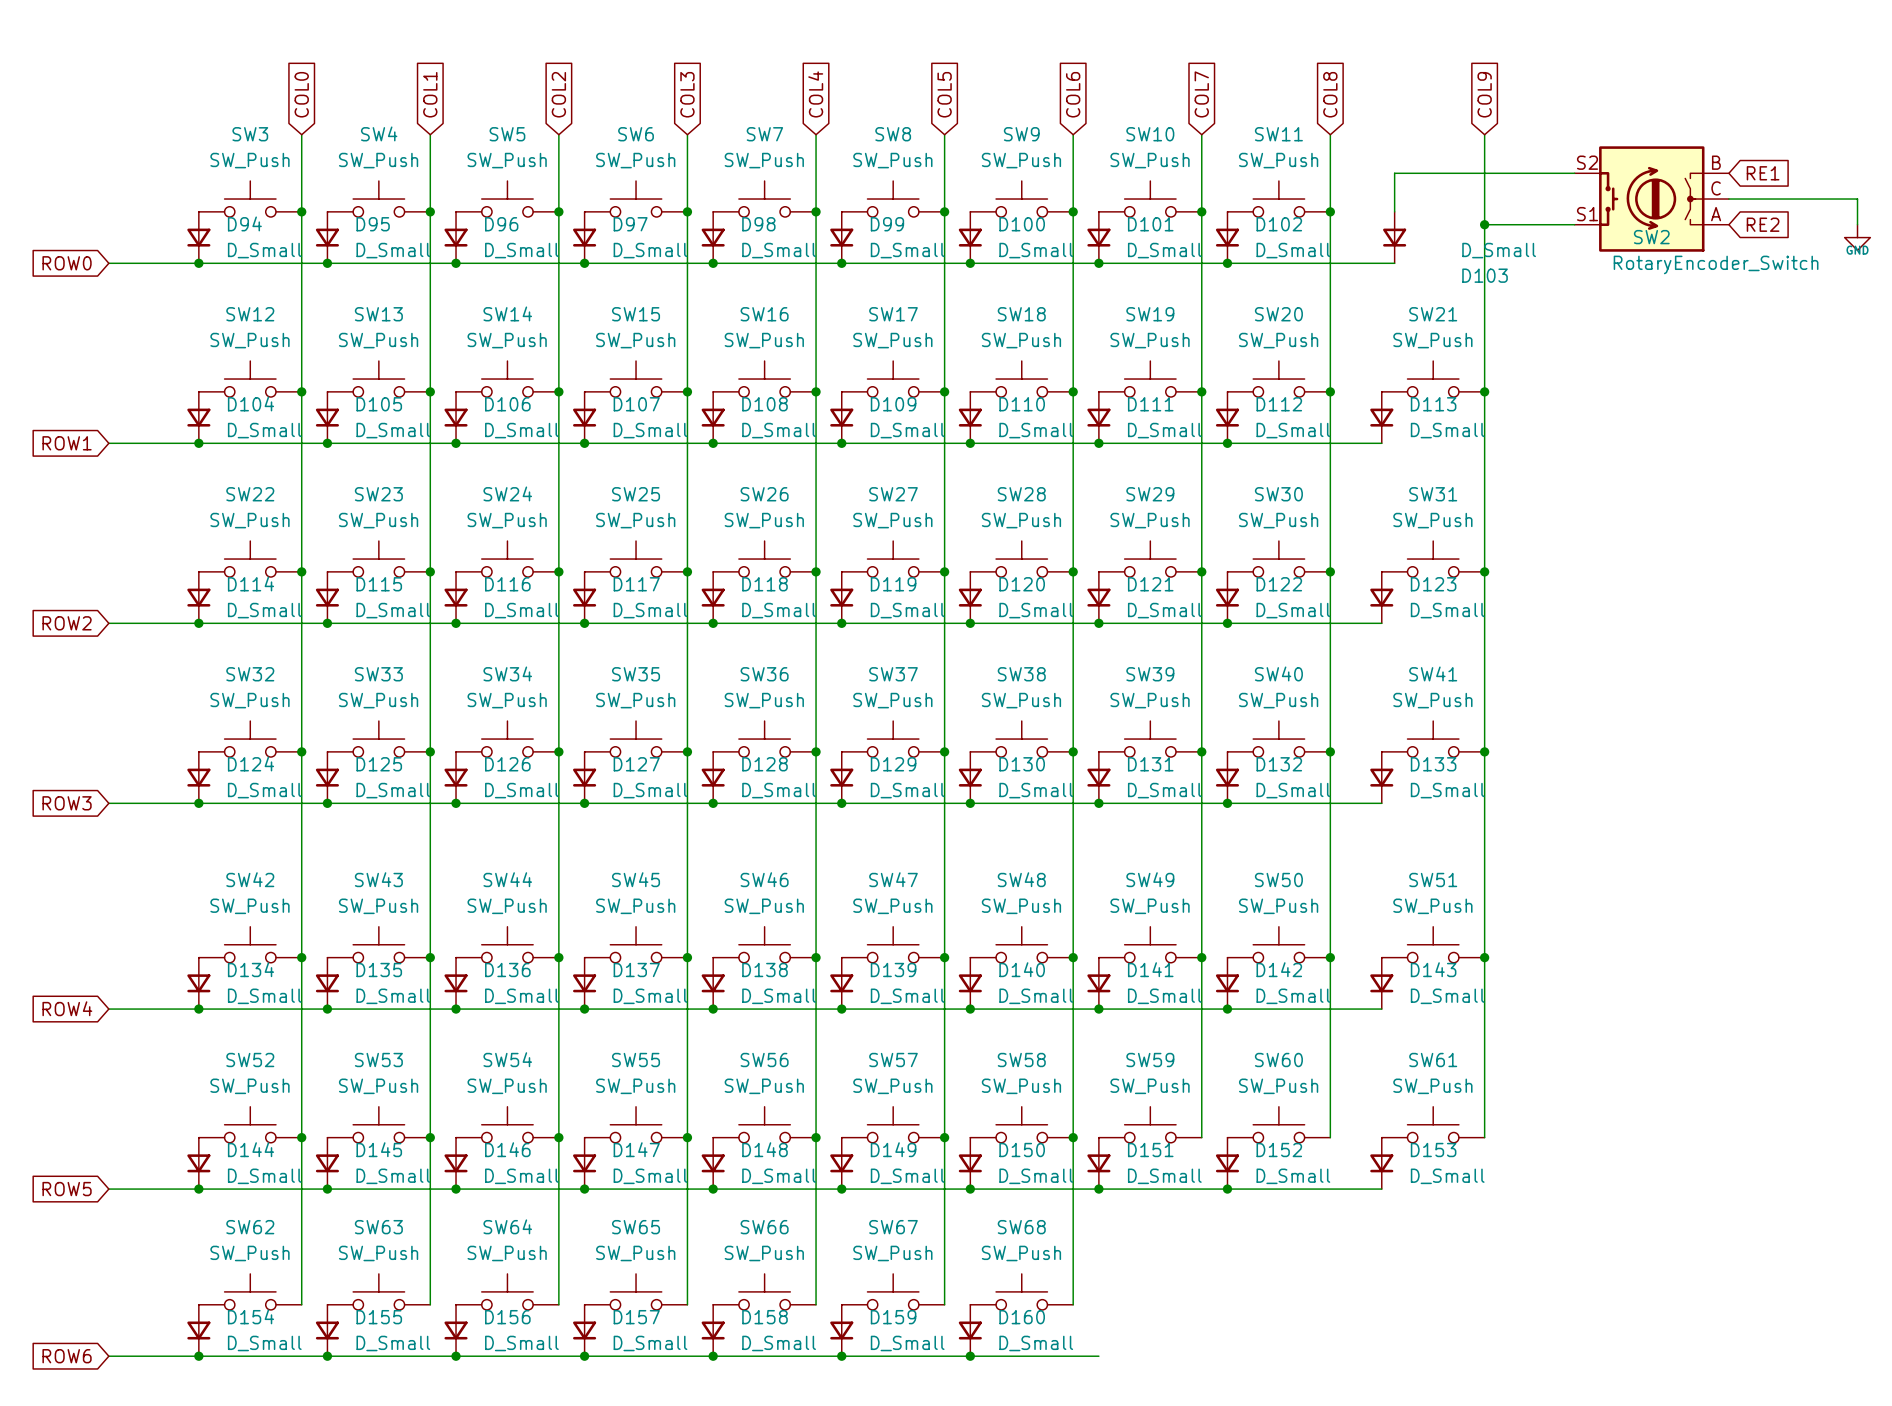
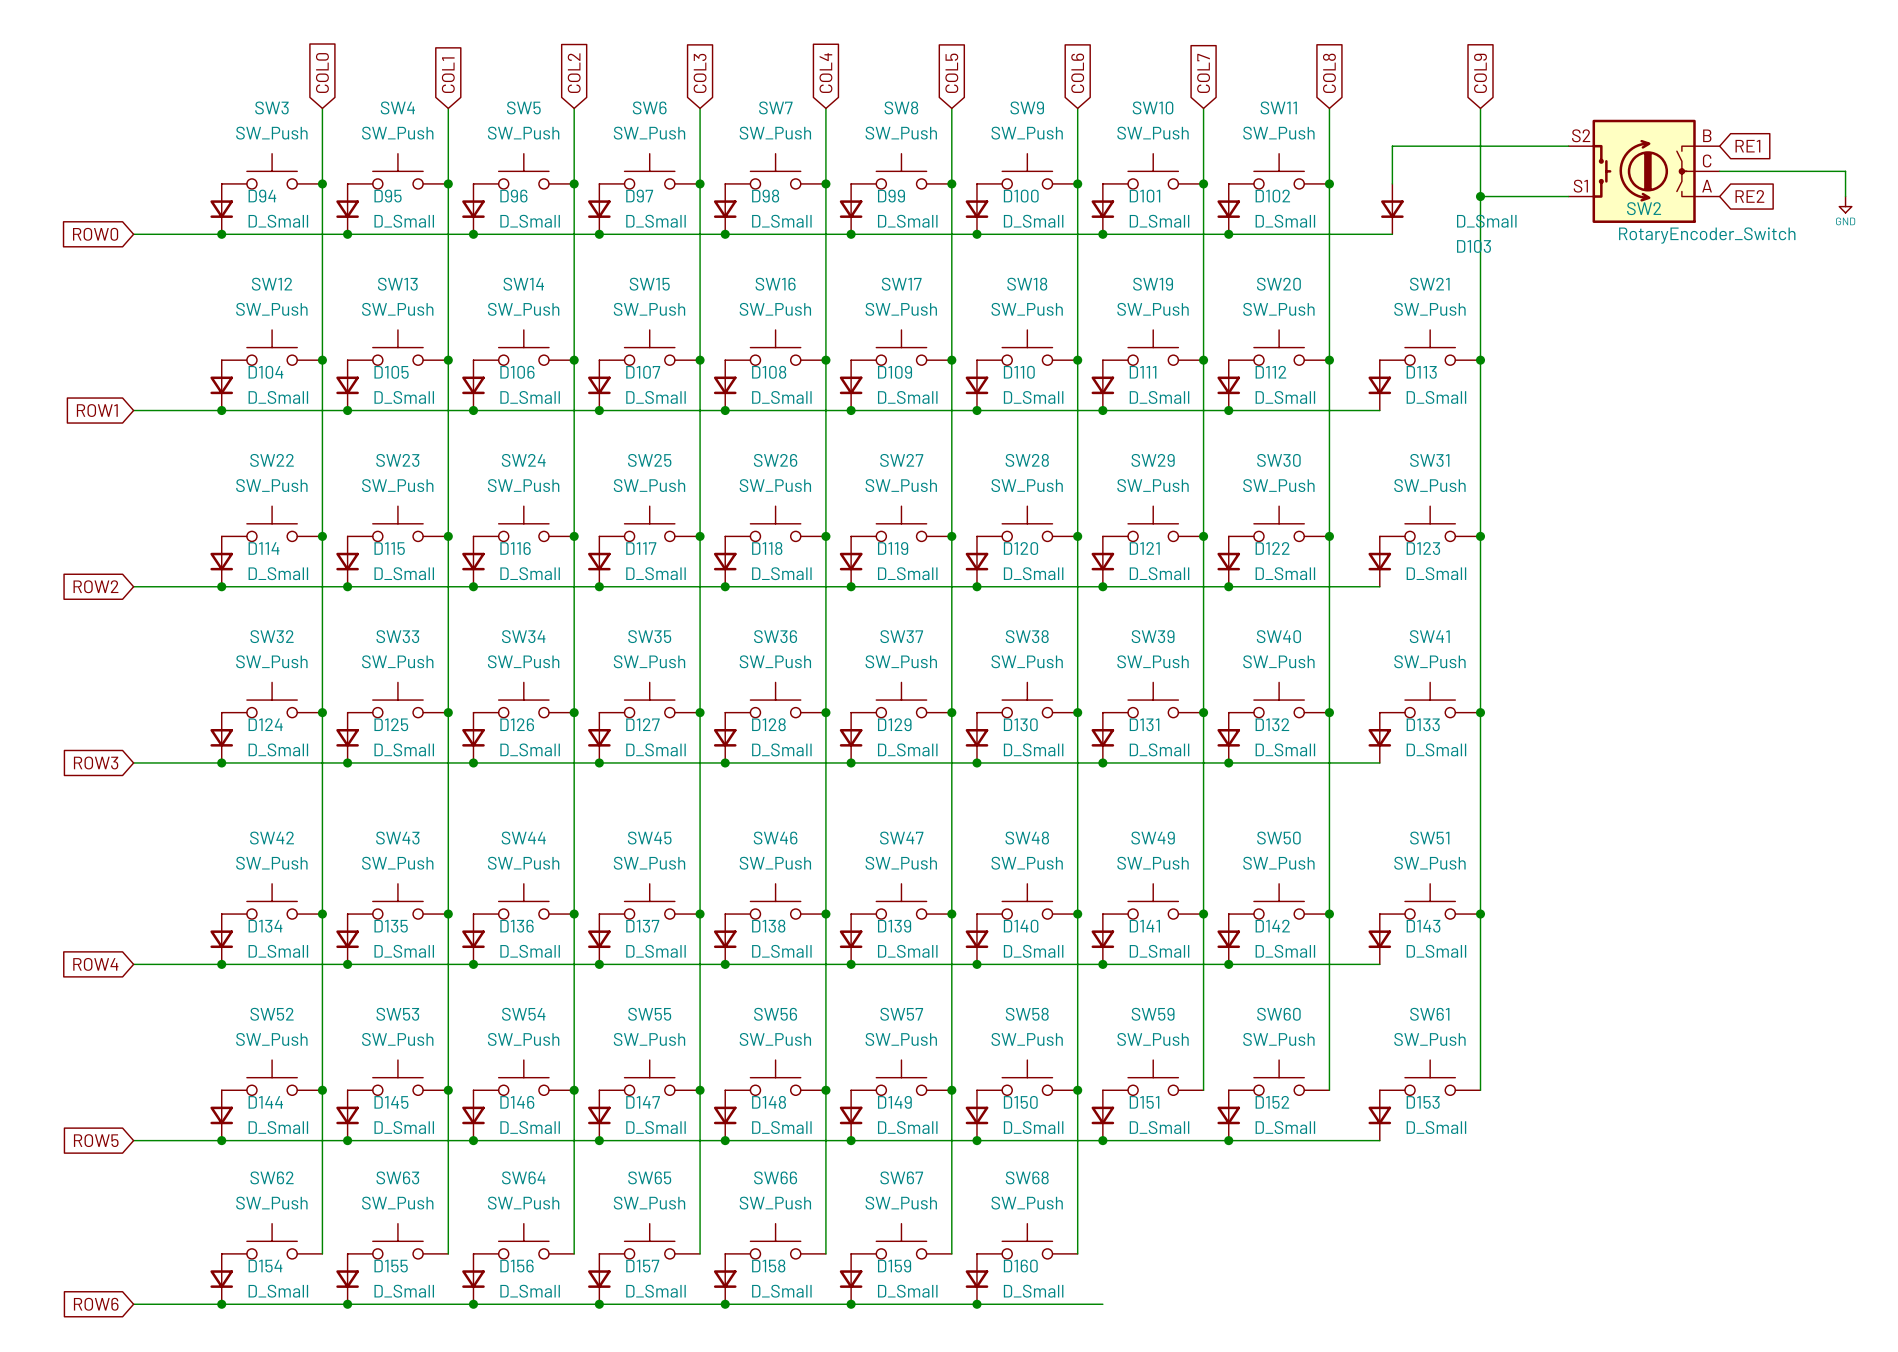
power symbol shape: [1844, 224, 1871, 251] -> [1839, 196, 1852, 213]

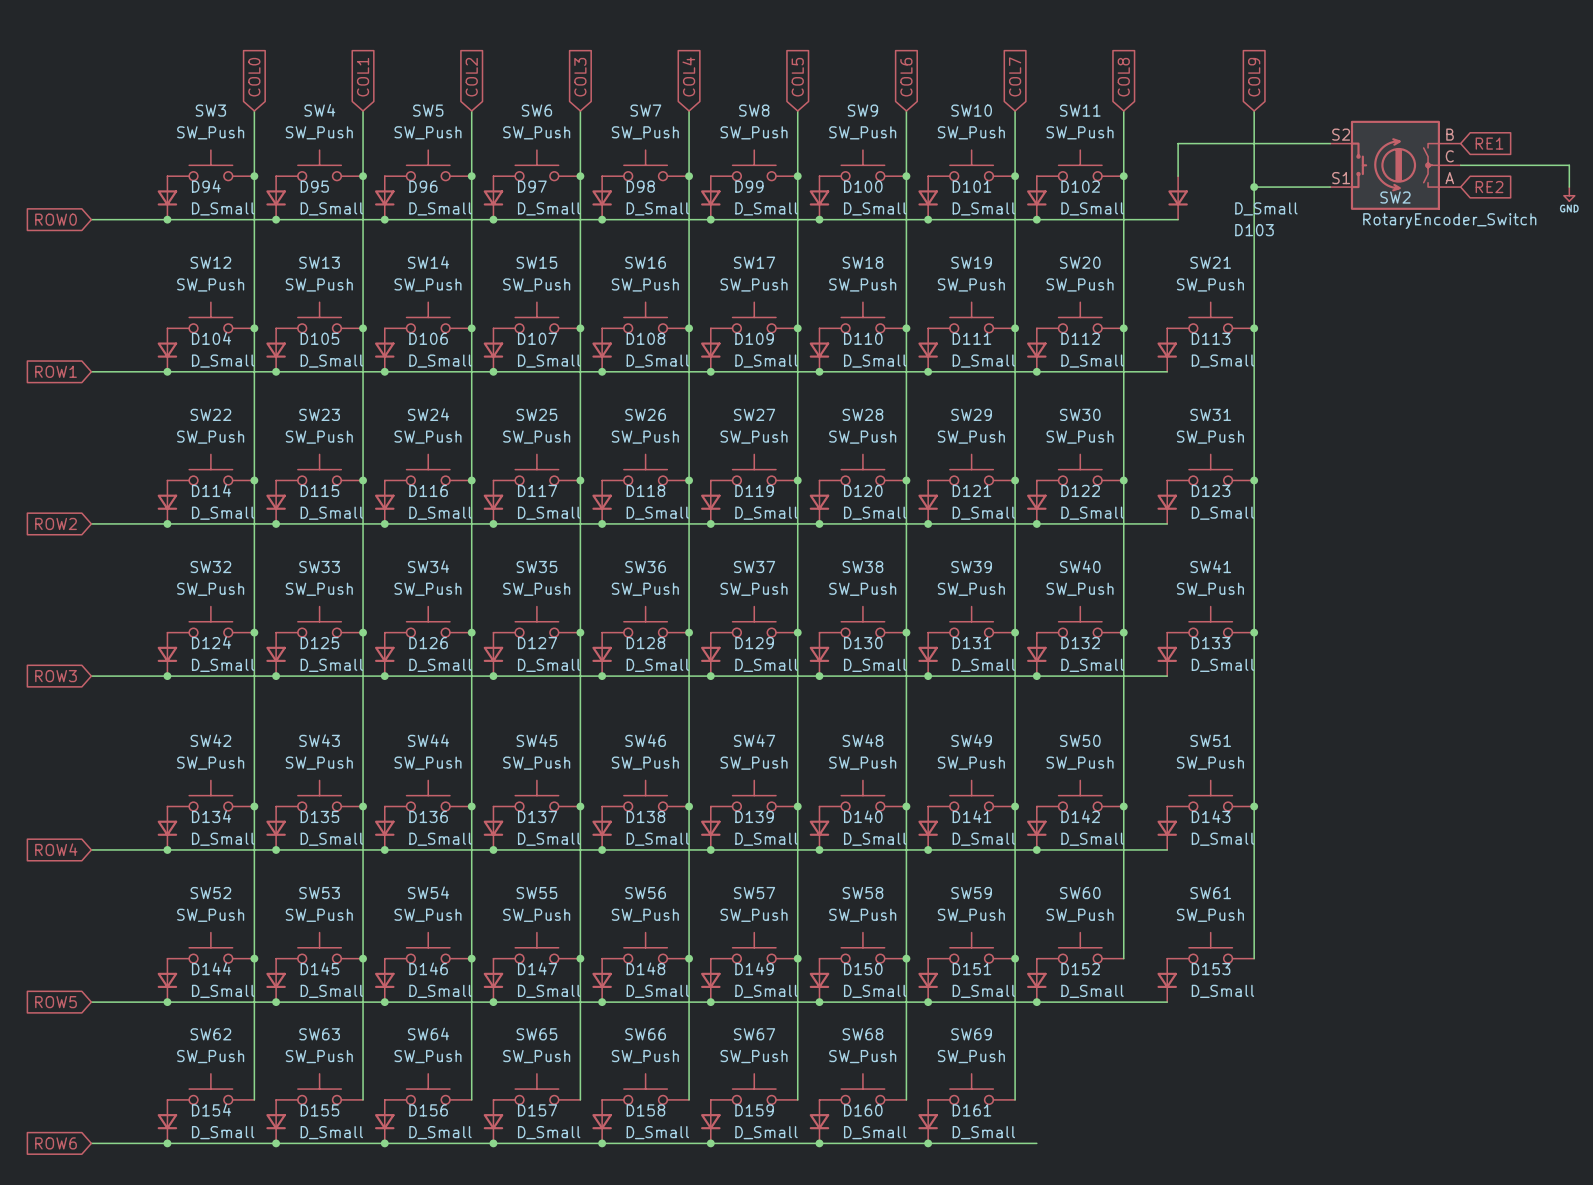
wire: none -> (1015, 958) (1015, 1099)
junction: none -> (1015, 958)
SW69: none -> SW_Push (971, 1089)
D161: none -> D_Small (928, 1121)
wire: none -> (928, 1143) (1036, 1143)
junction: none -> (928, 1143)

